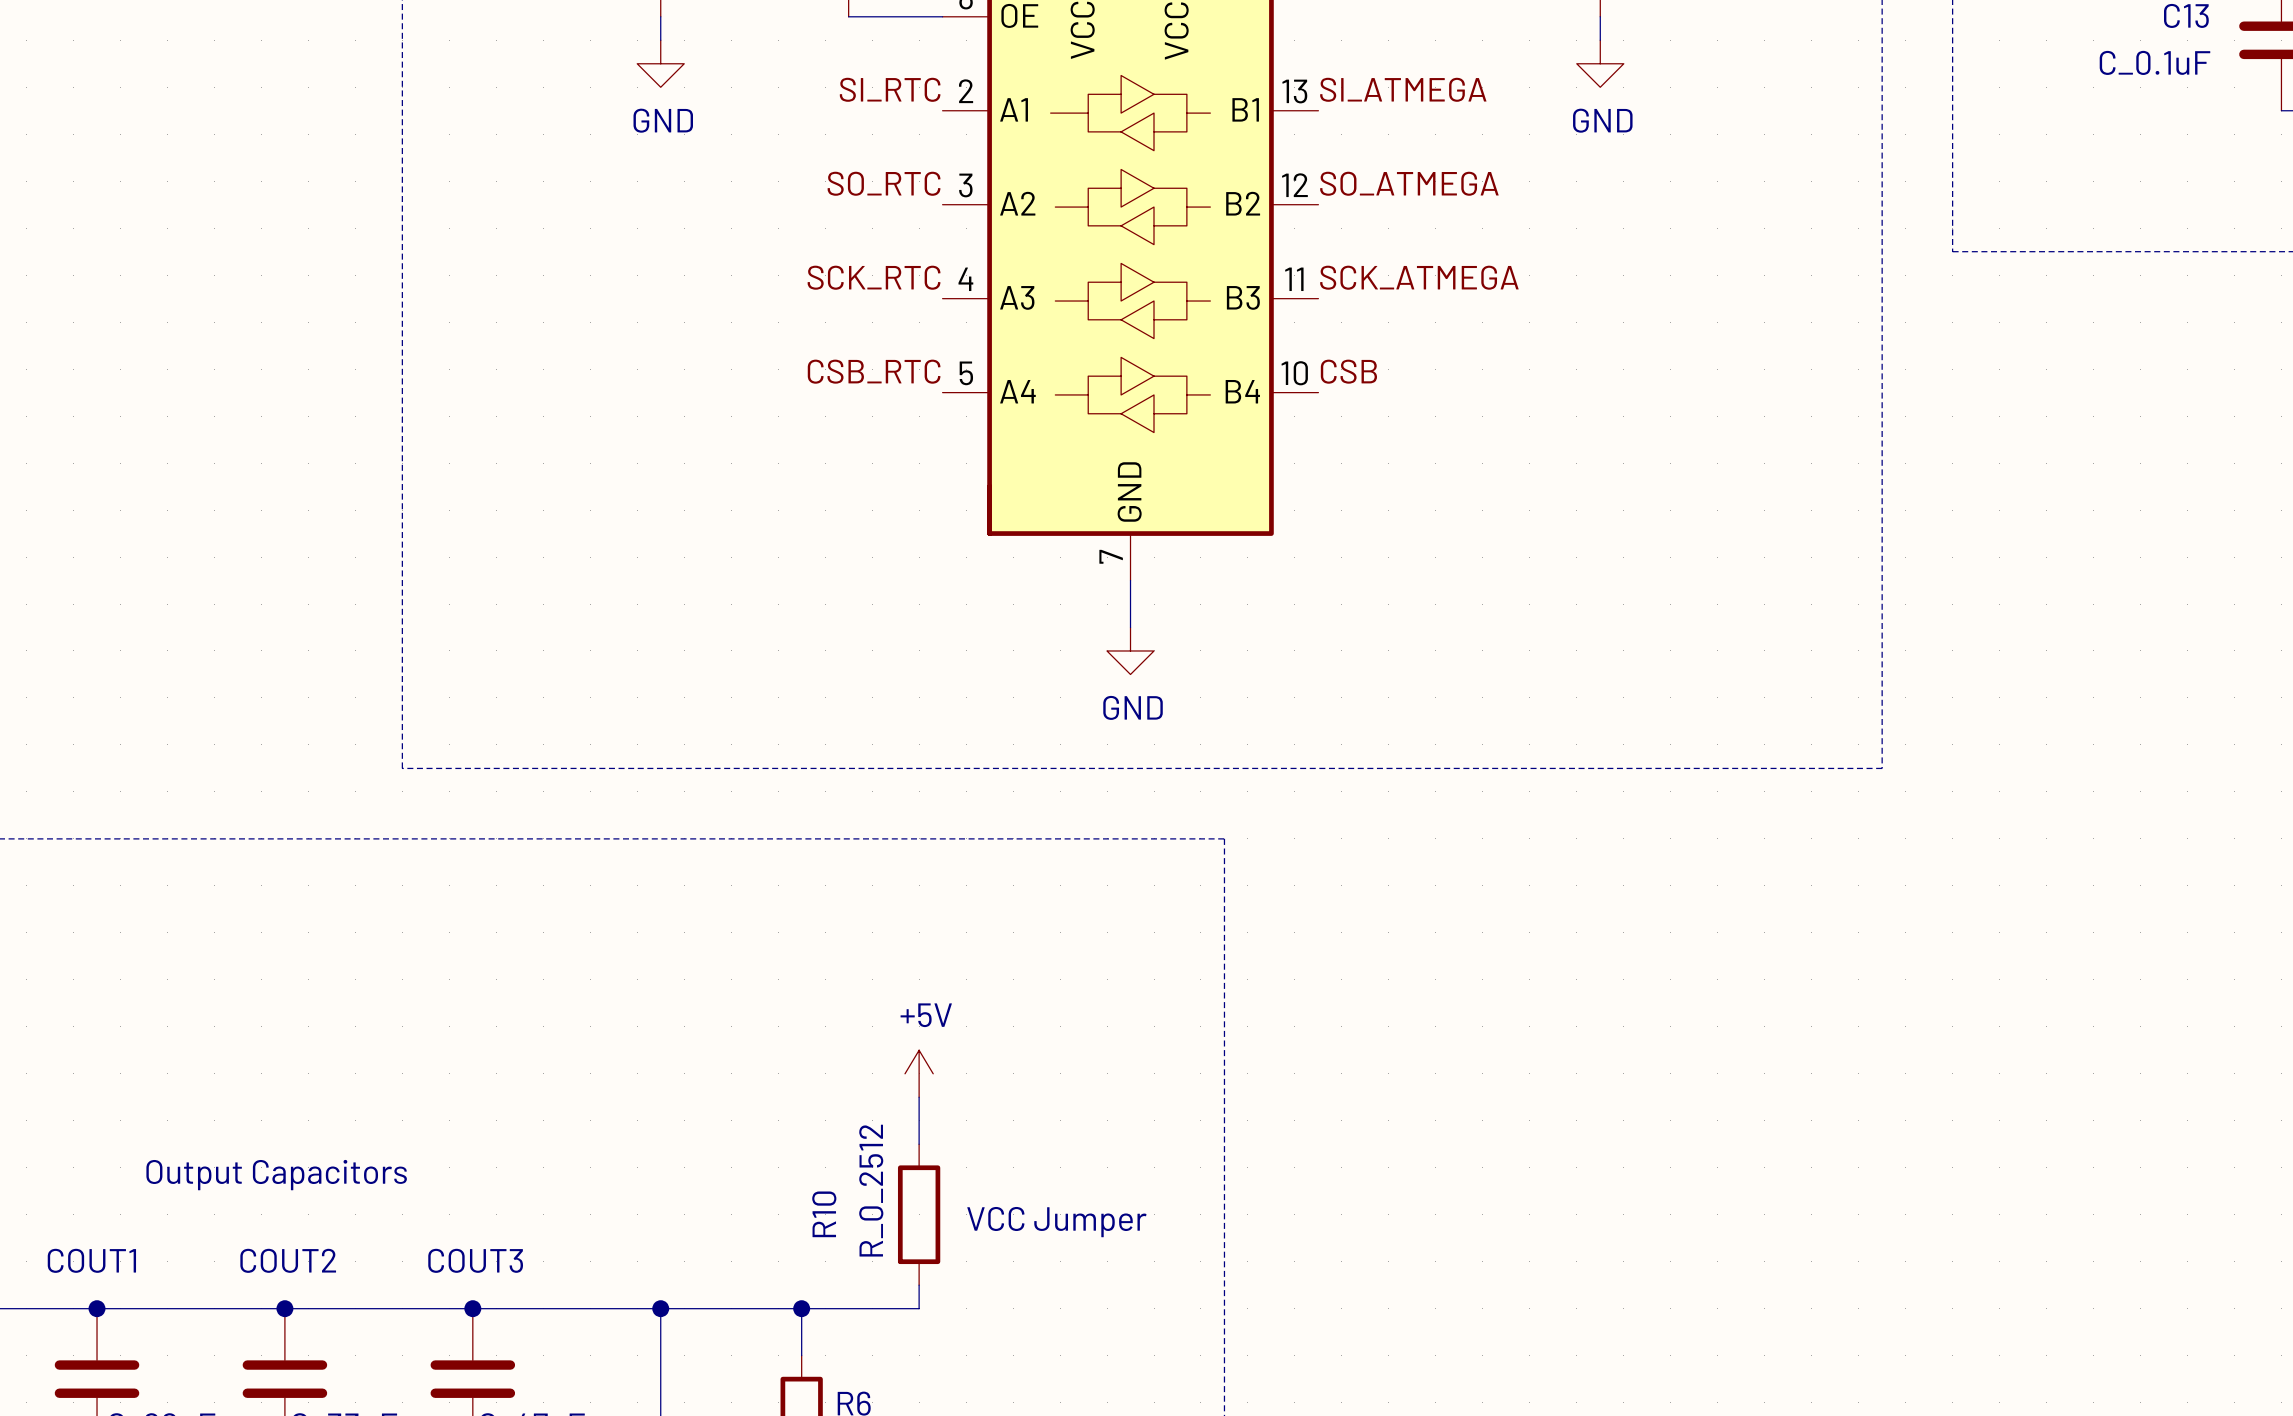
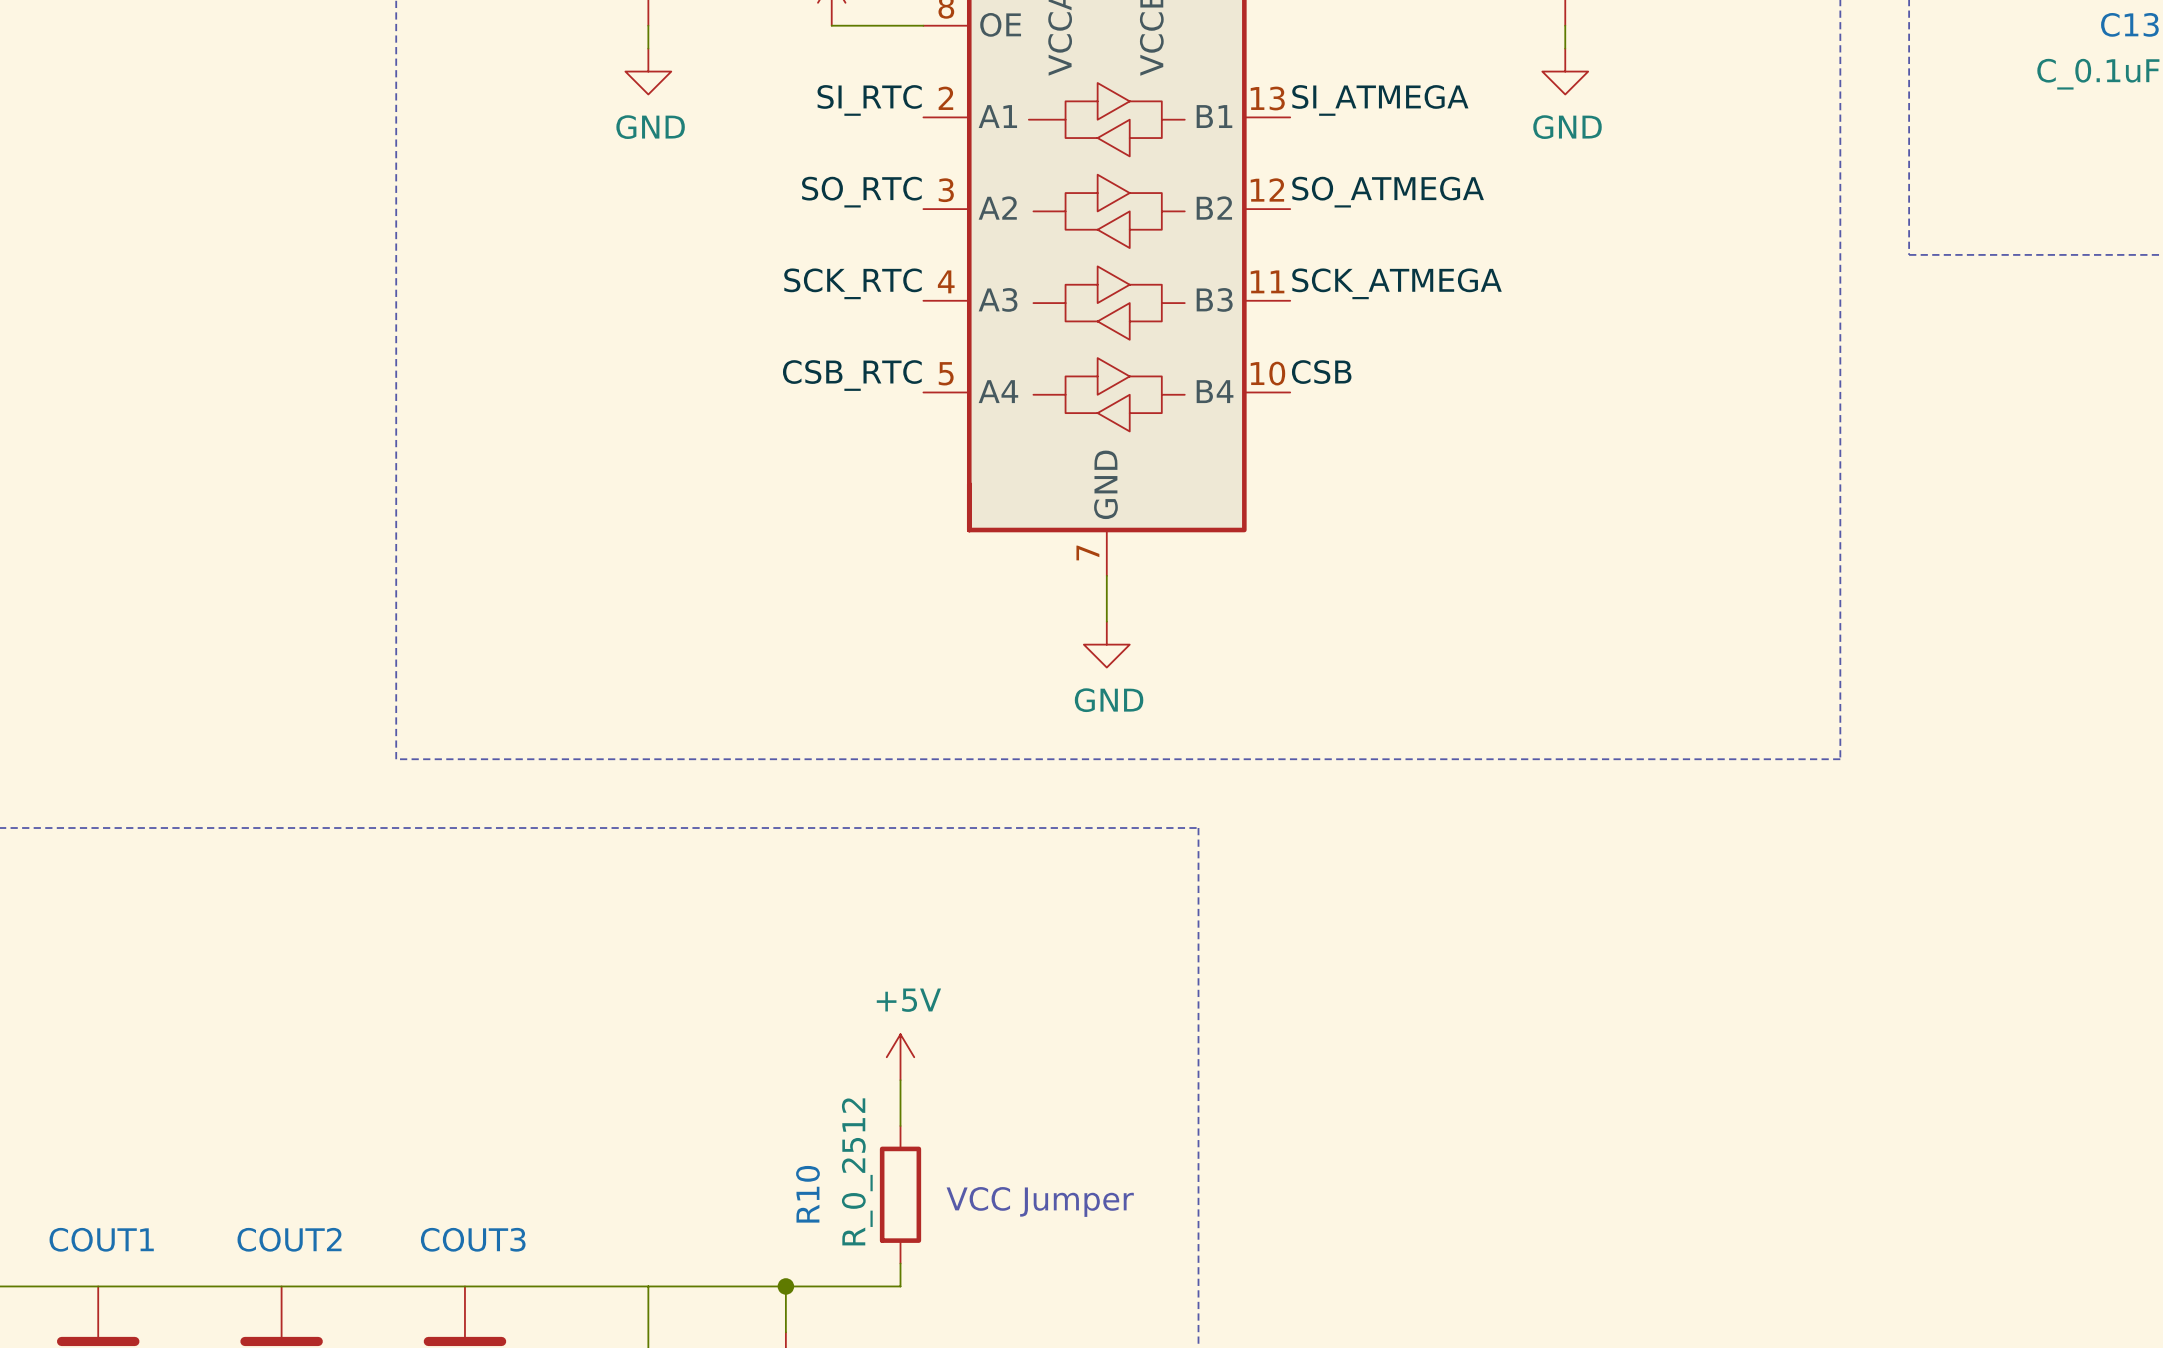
text: Output Capacitors (276, 1175) -> none
junction: (97, 1308) -> none
junction: (284, 1308) -> none
junction: (472, 1308) -> none
junction: (660, 1308) -> none

